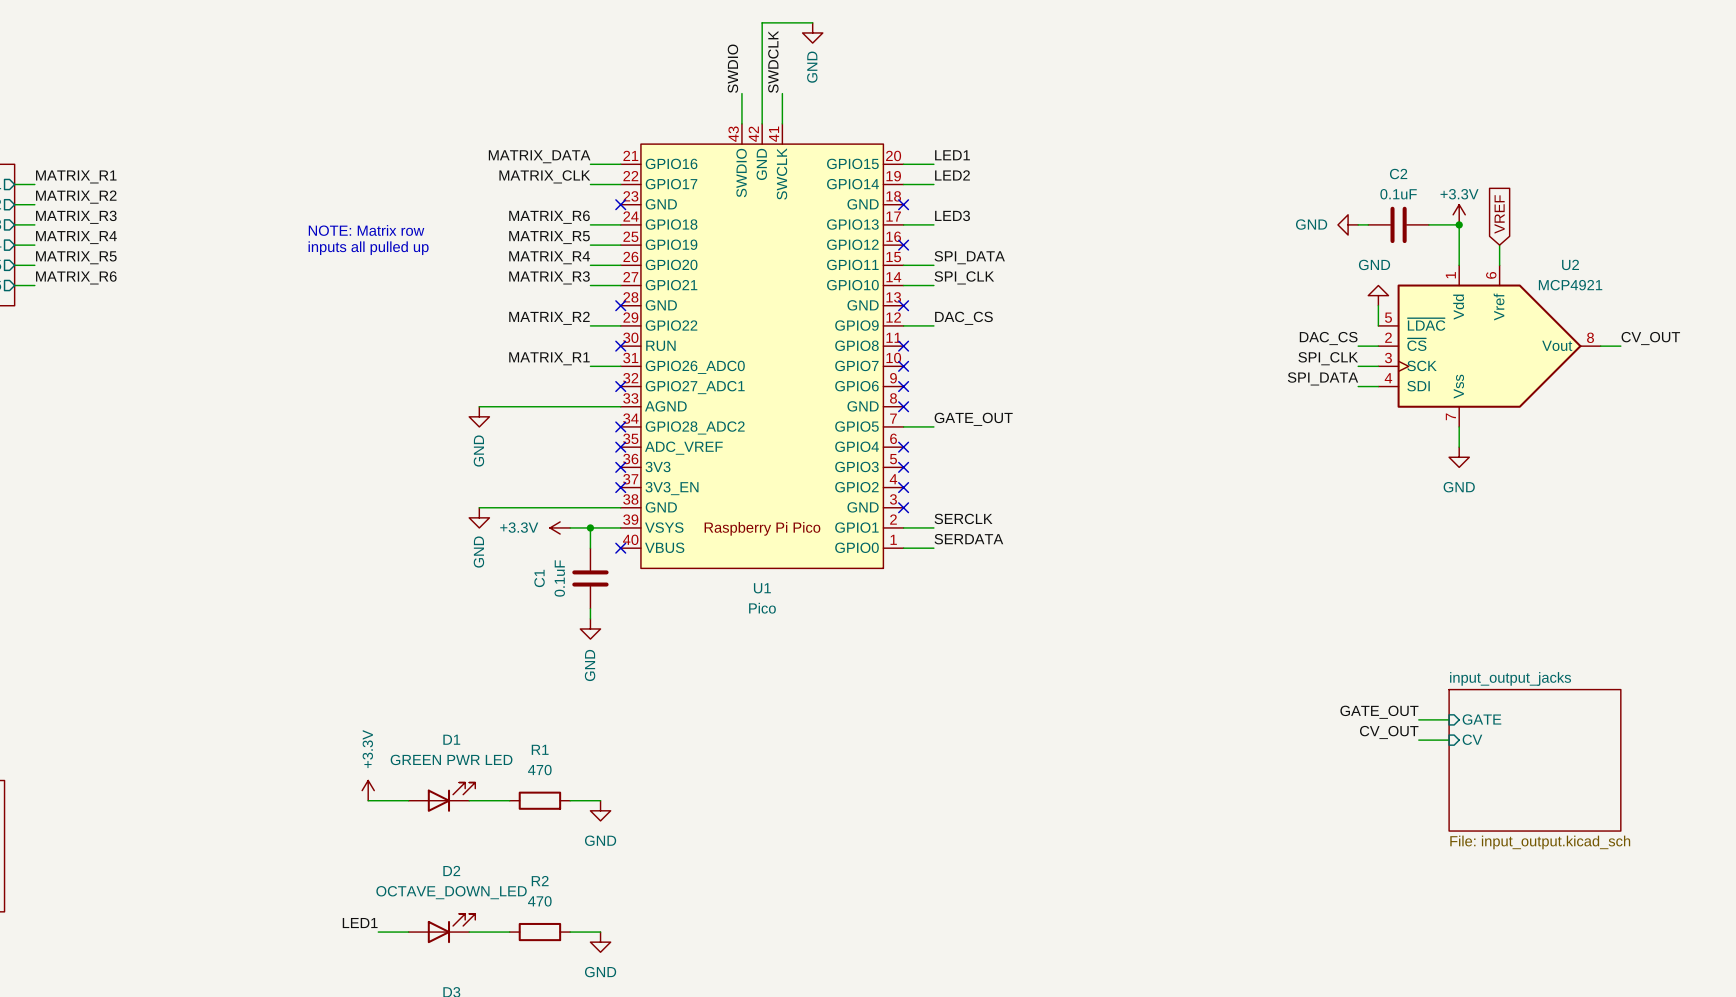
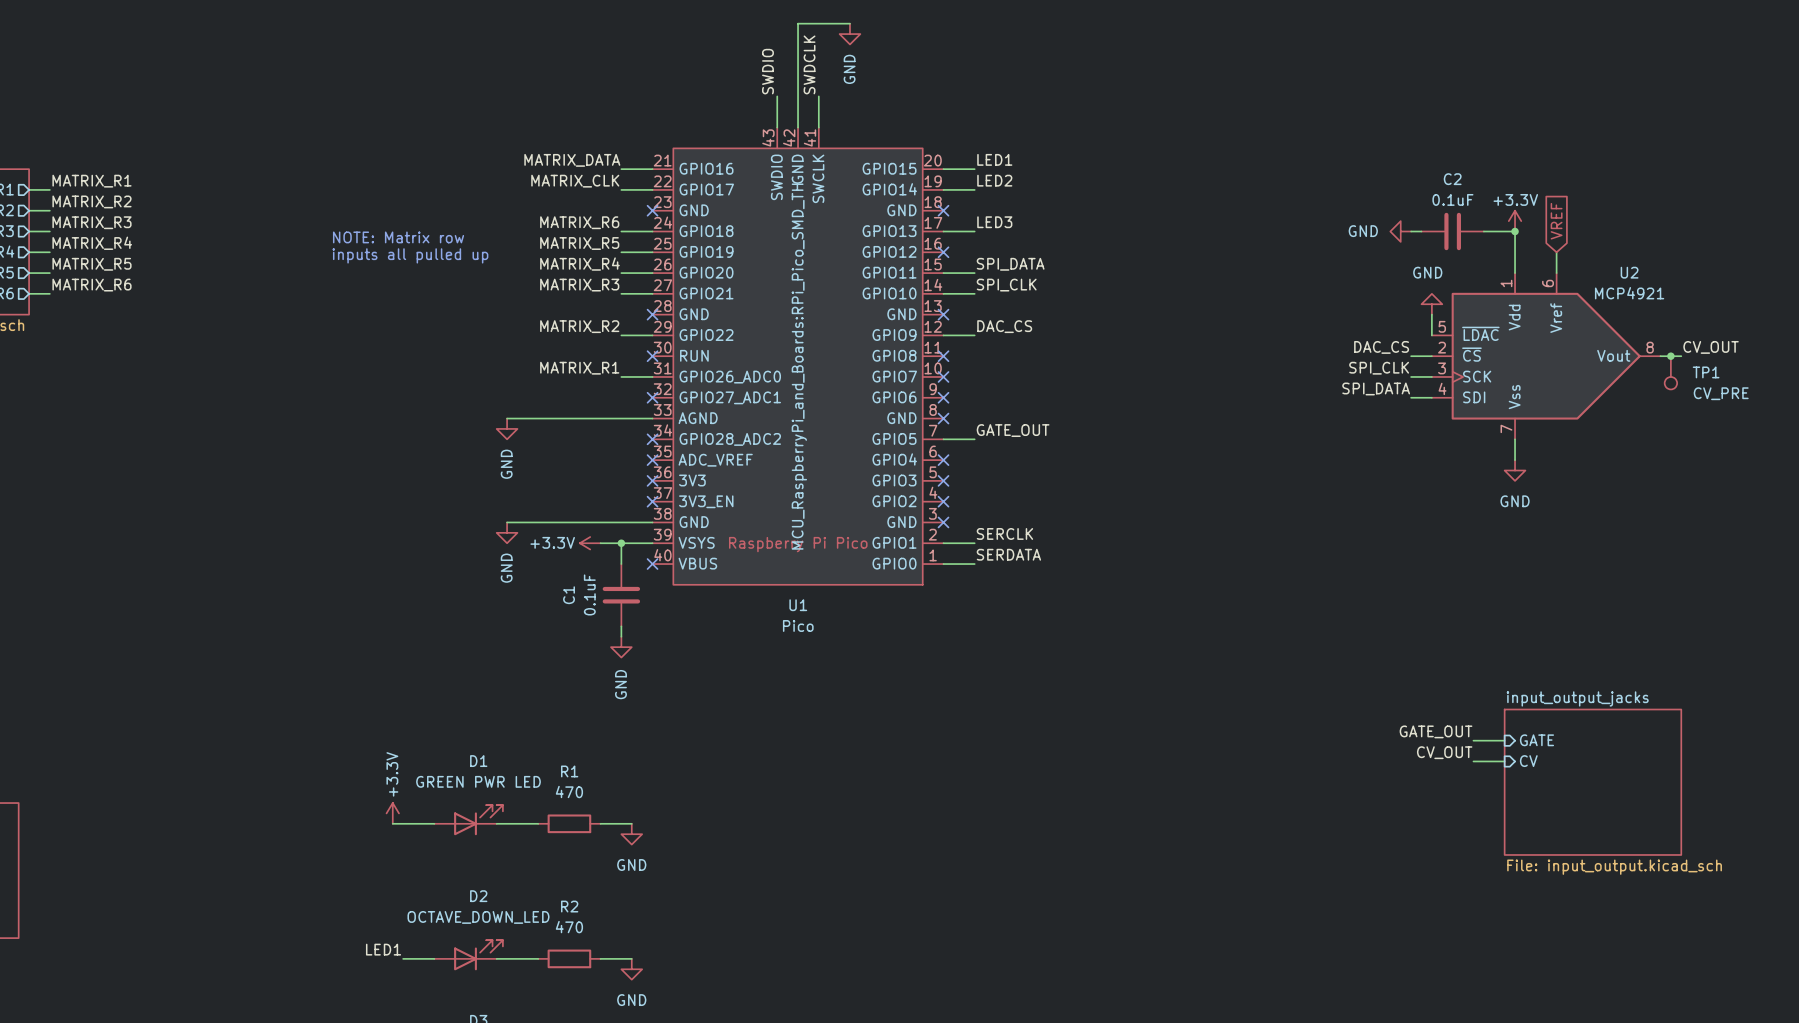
junction: none -> (1670, 356)
U1 text: none -> MCU_RaspberryPi_and_Boards:RPi_Pico_SMD_TH (799, 366)
TP1: none -> CV_PRE (1670, 372)

